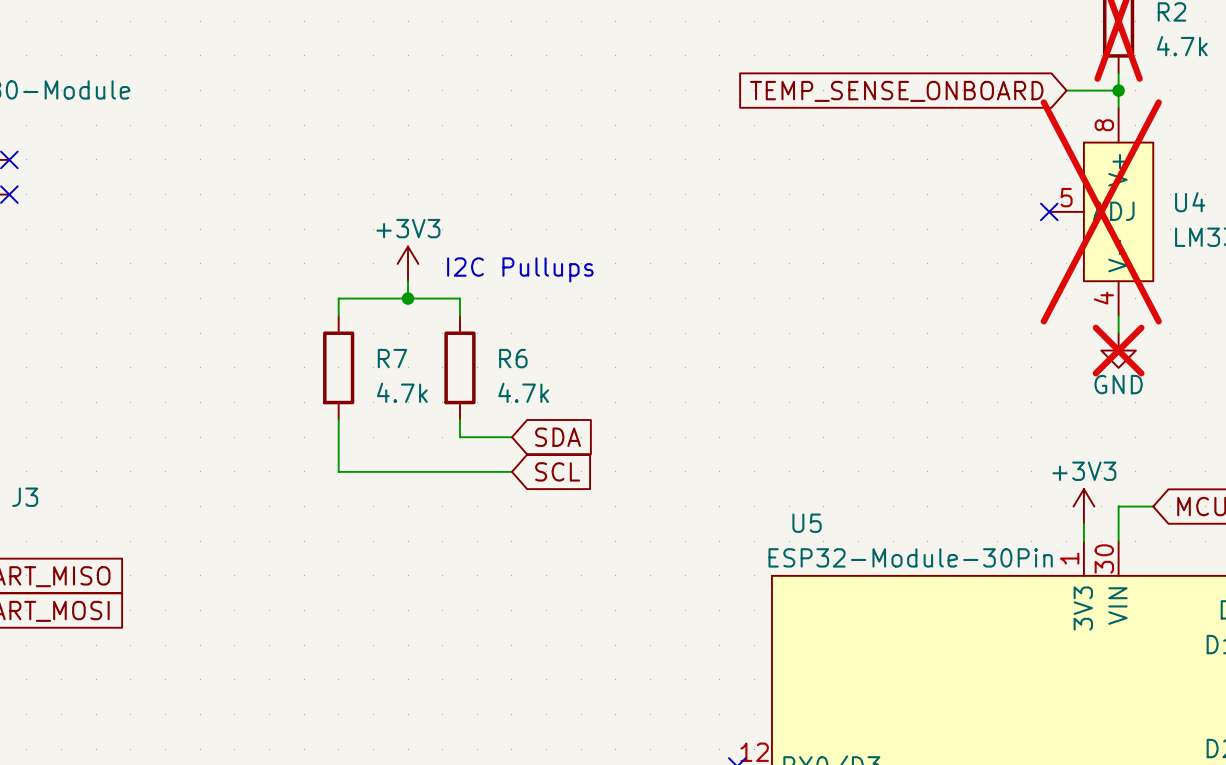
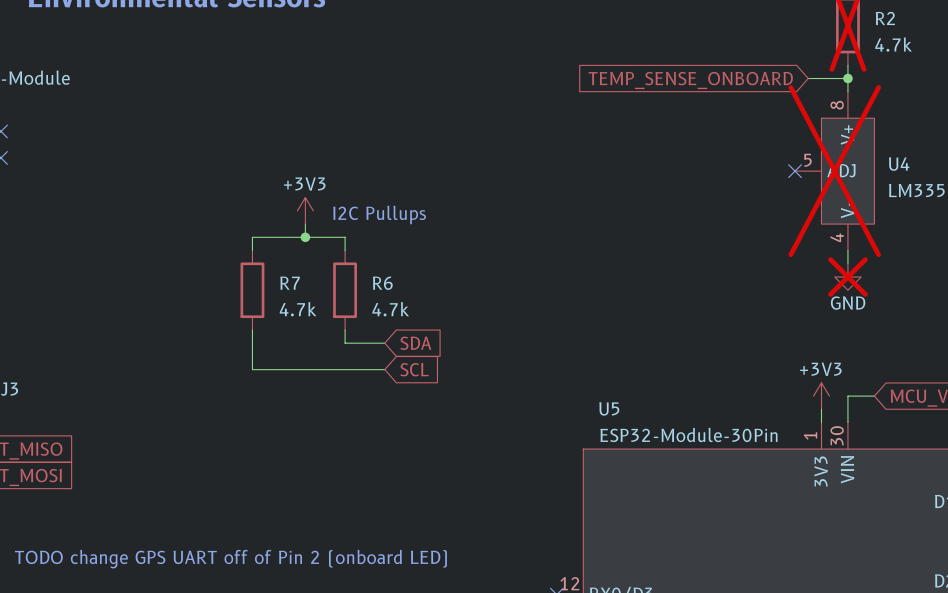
text: none -> TODO change GPS UART off of Pin 2 (onboard LED) (230, 559)

